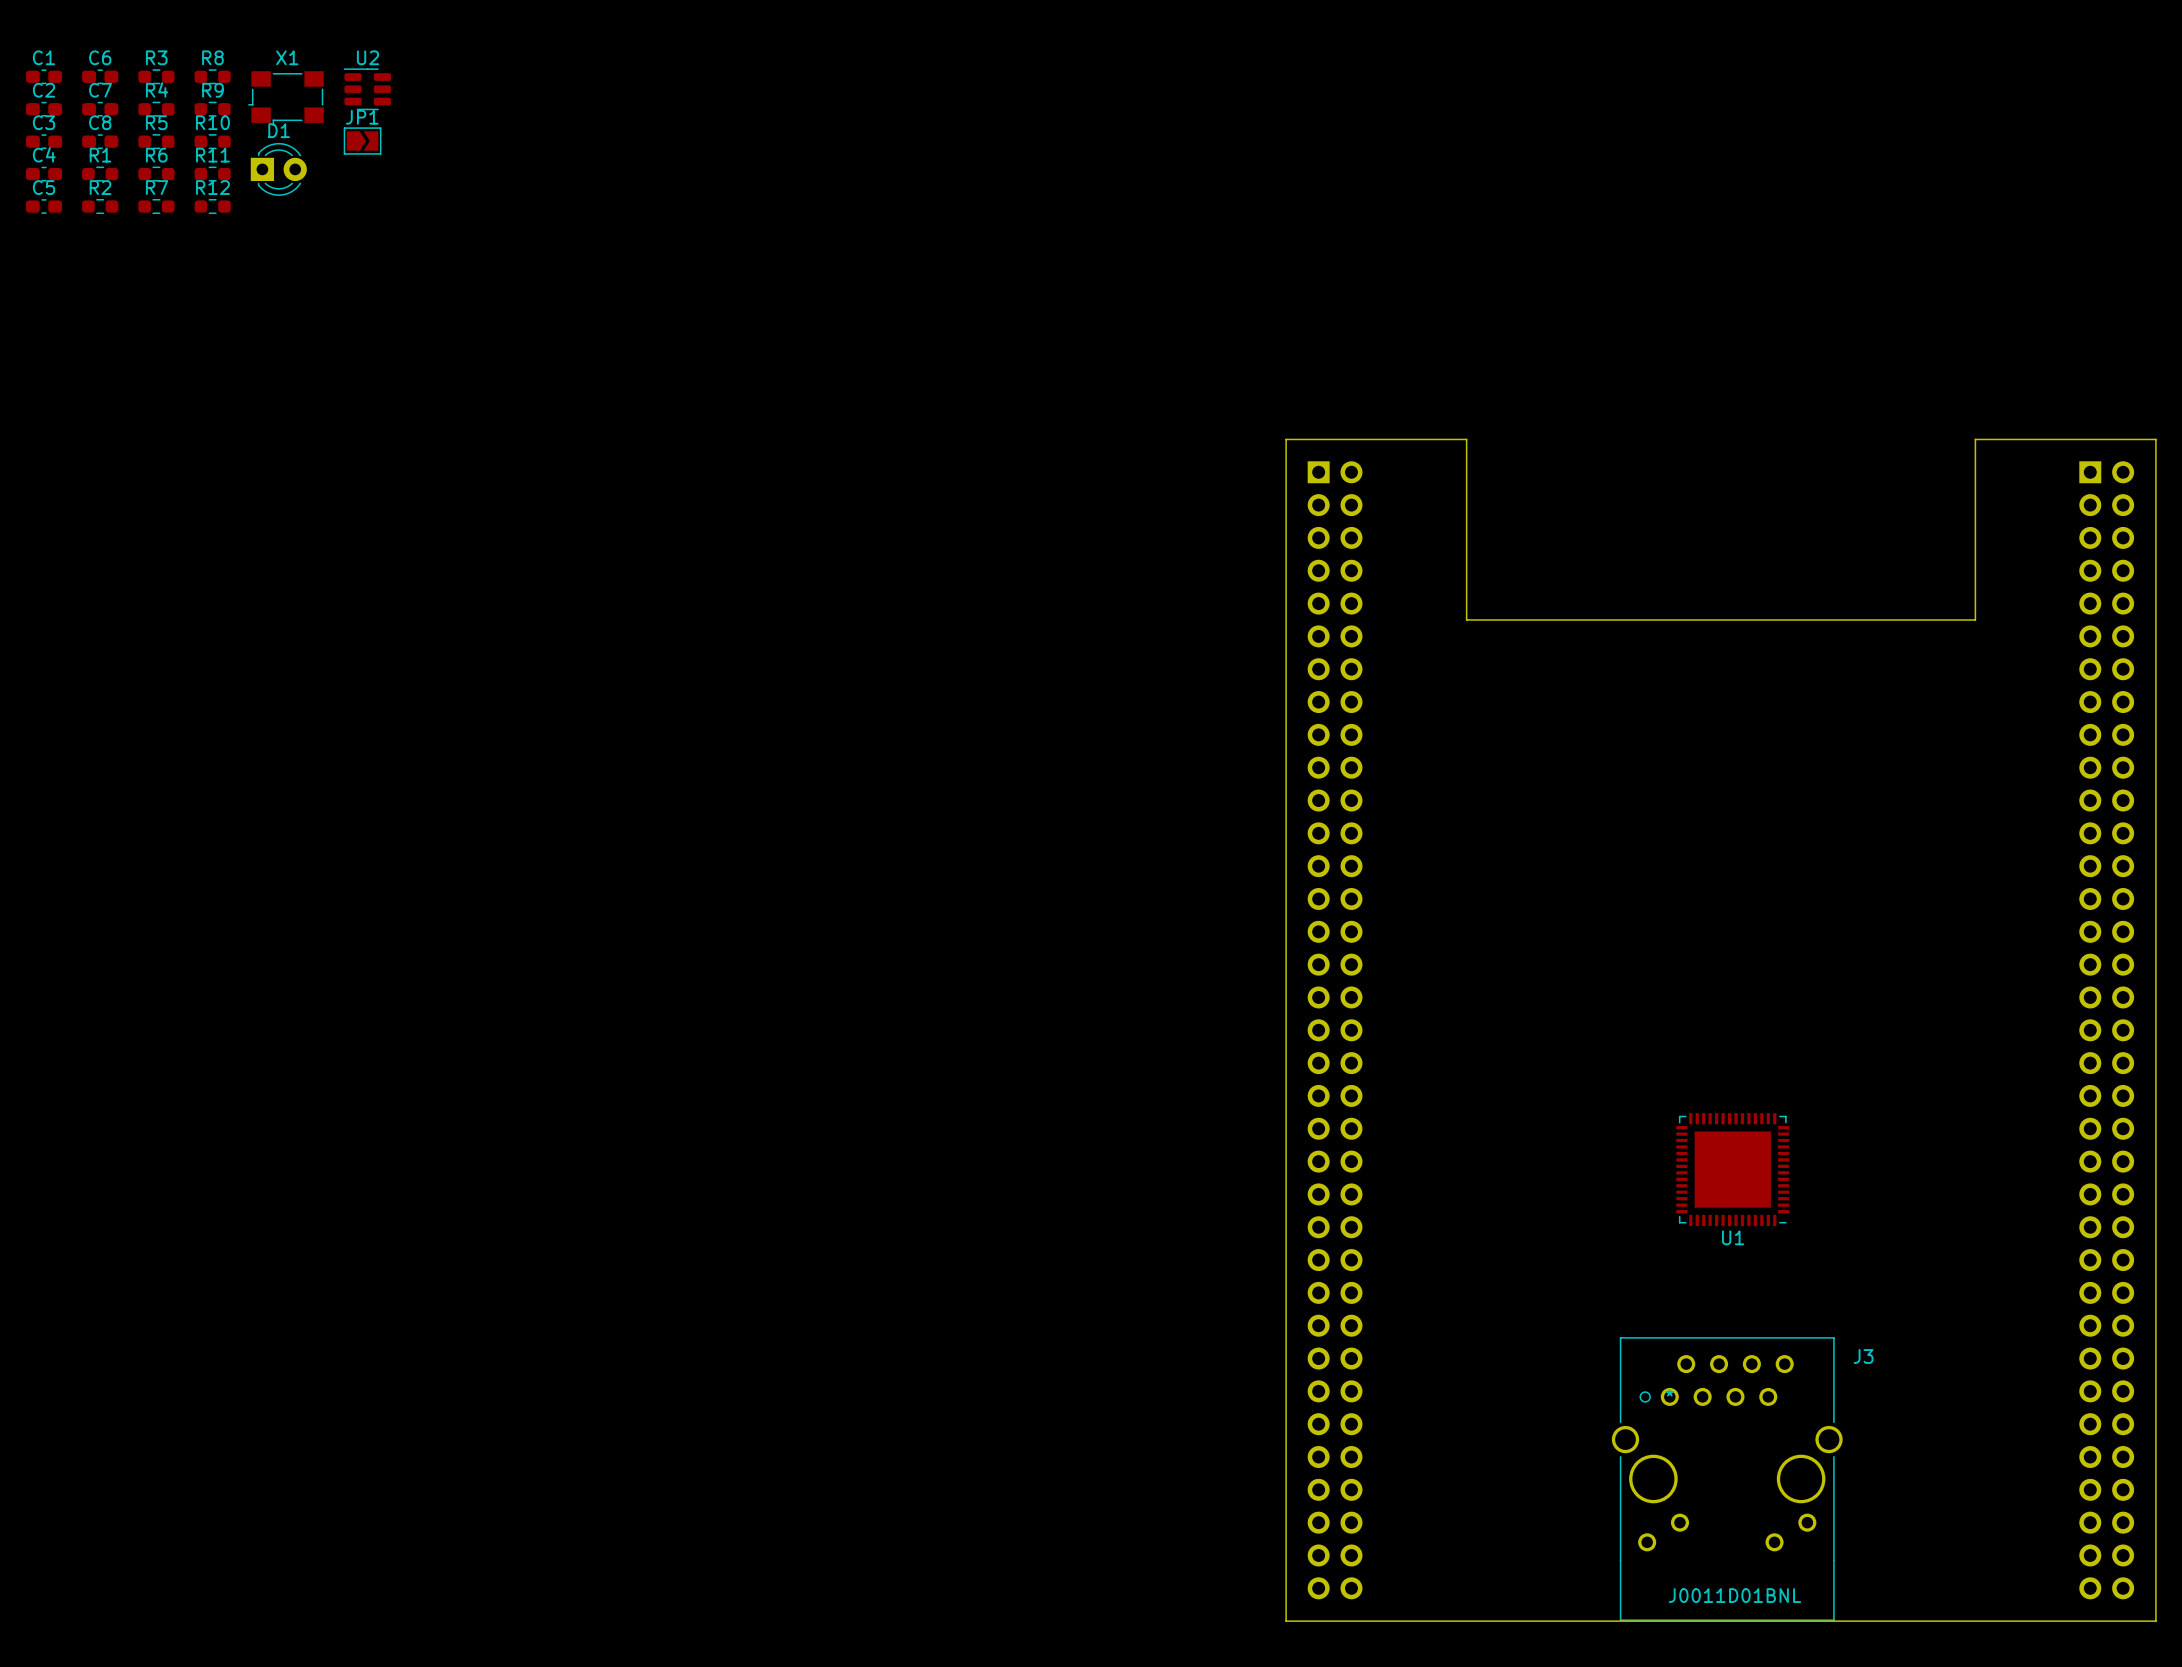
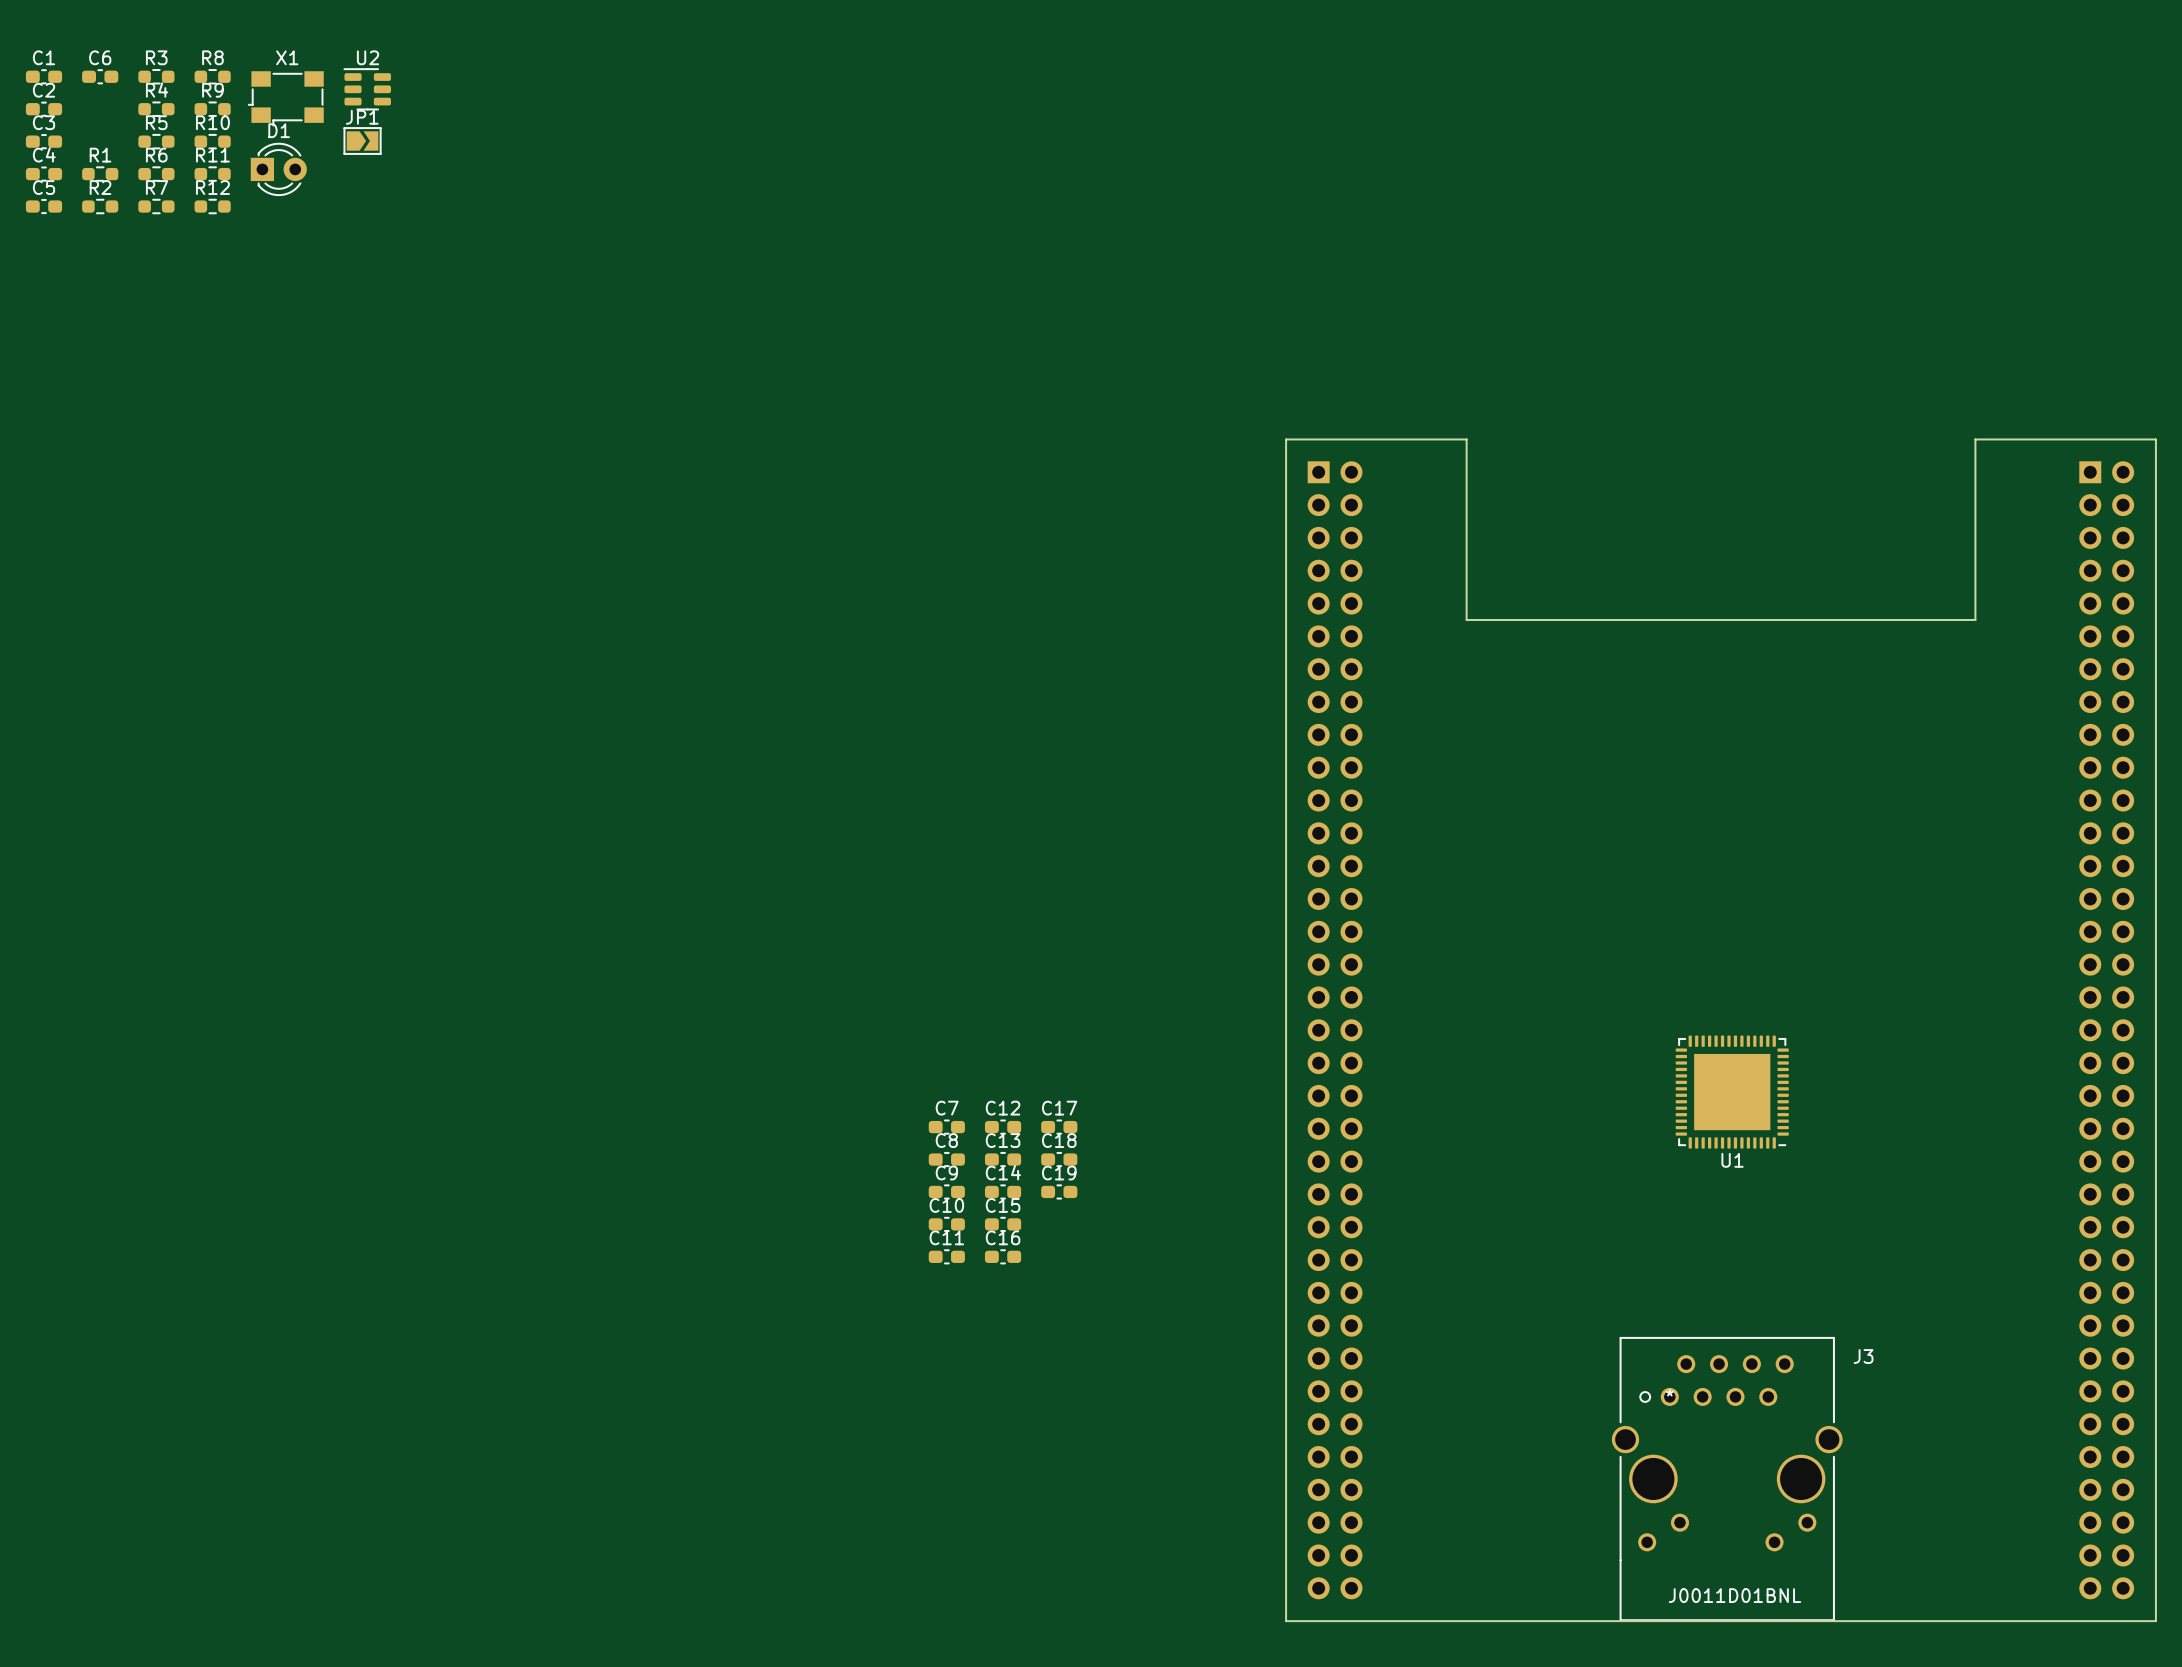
C7 position: (100, 109) -> (946, 1127)
C8 position: (100, 141) -> (946, 1159)
C12: none -> (1003, 1127)
C17: none -> (1059, 1127)
C13: none -> (1003, 1159)
C18: none -> (1059, 1159)
U1 position: (1732, 1169) -> (1732, 1092)
C9: none -> (946, 1191)
C14: none -> (1003, 1191)
C19: none -> (1059, 1191)
C10: none -> (946, 1224)
C15: none -> (1003, 1224)
C11: none -> (946, 1256)
C16: none -> (1003, 1256)

